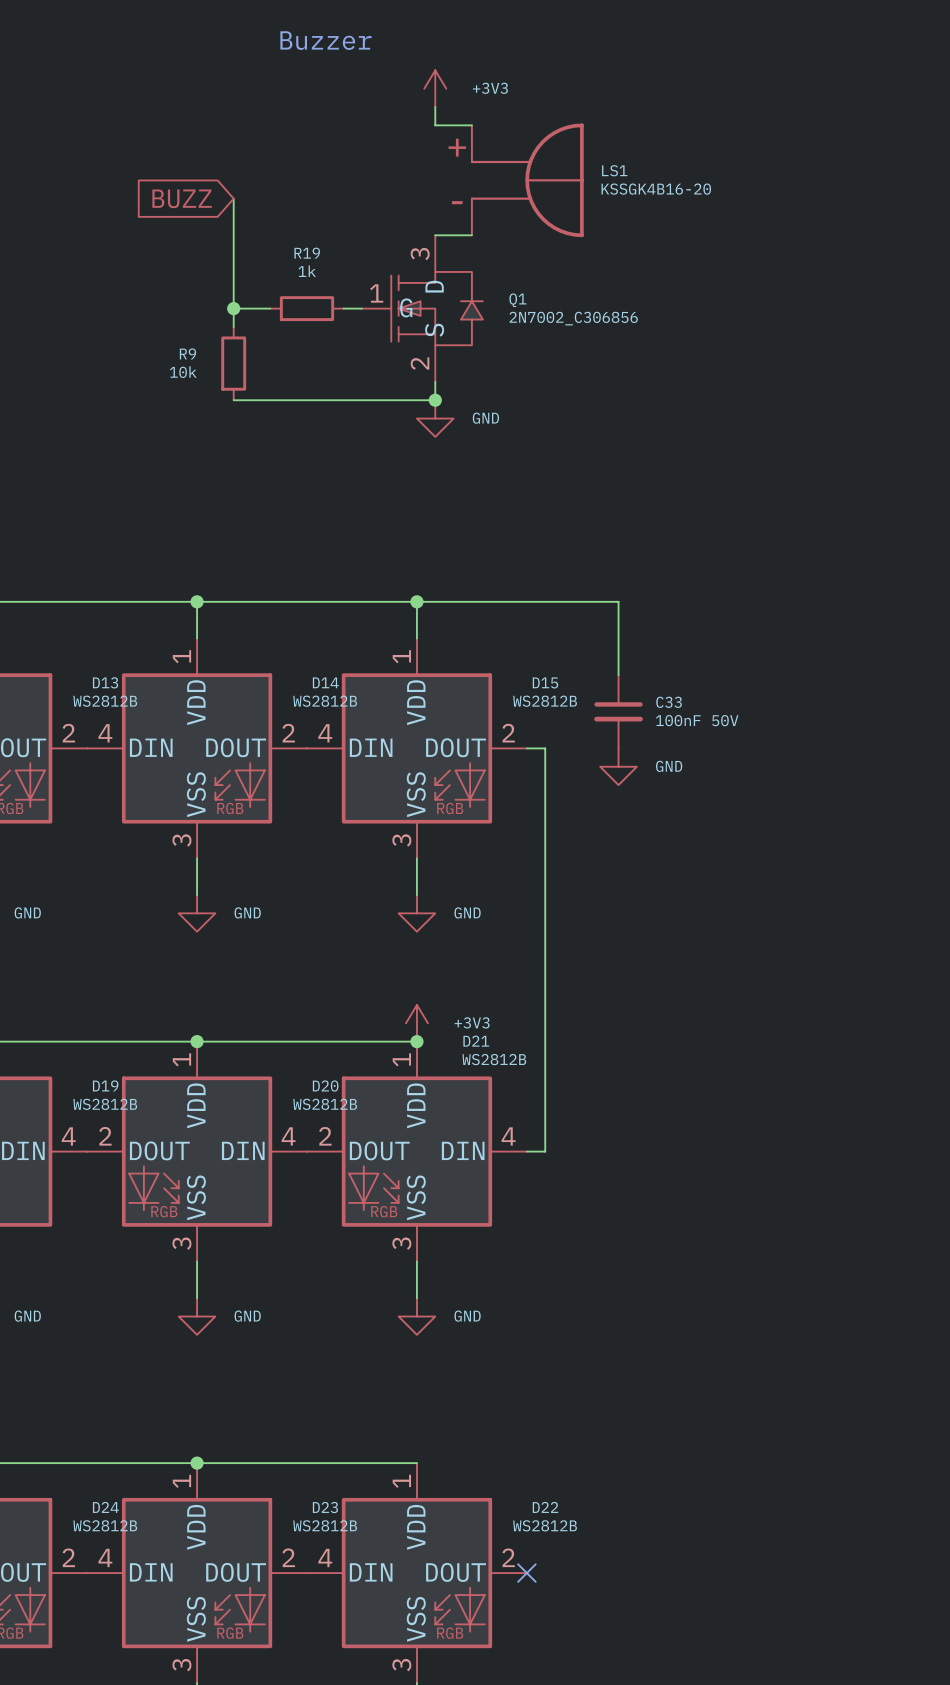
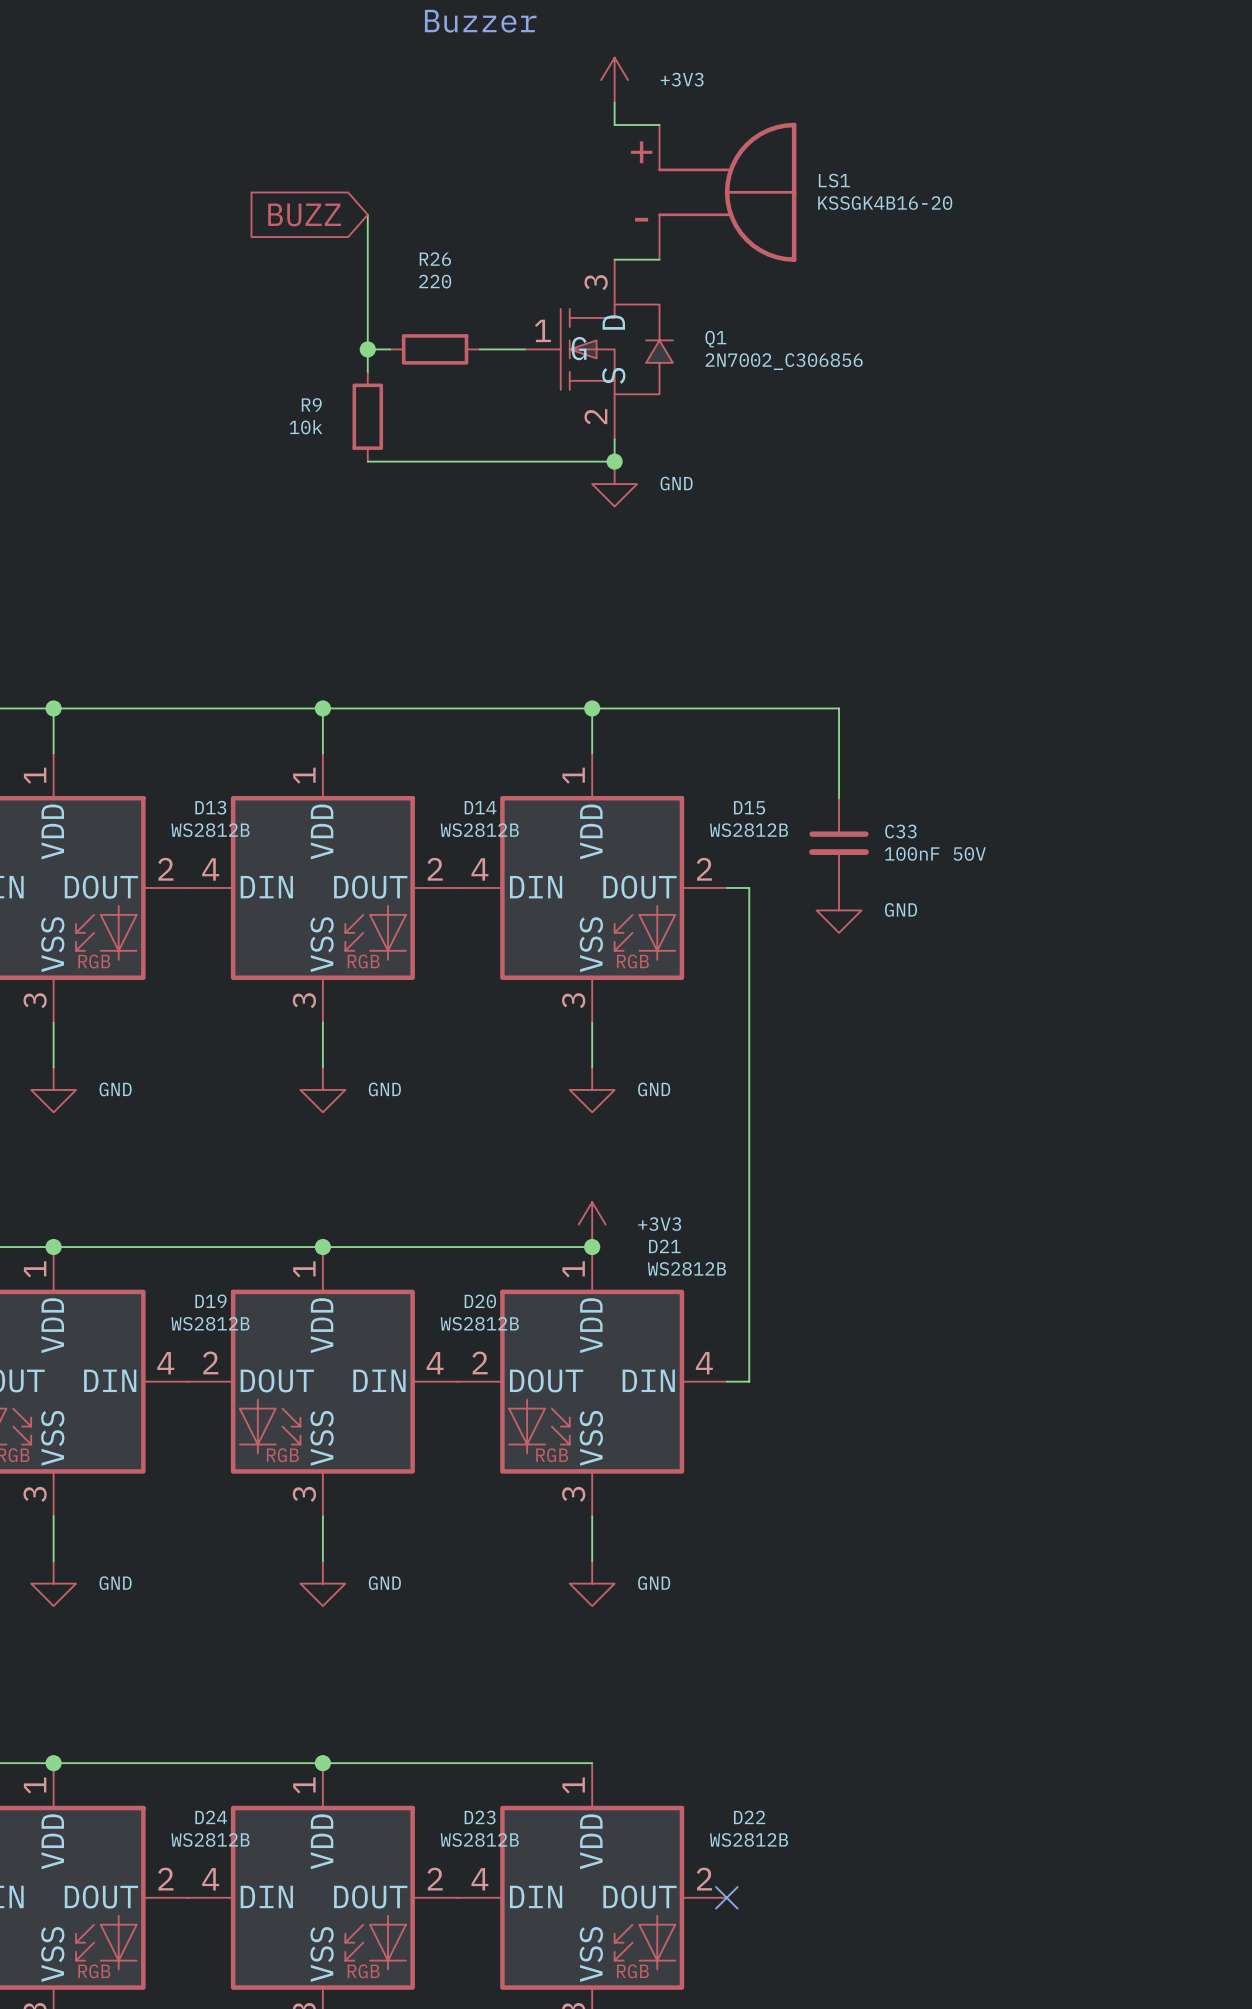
R26: none -> 220 (435, 349)
R19: 1k (307, 308) -> none

